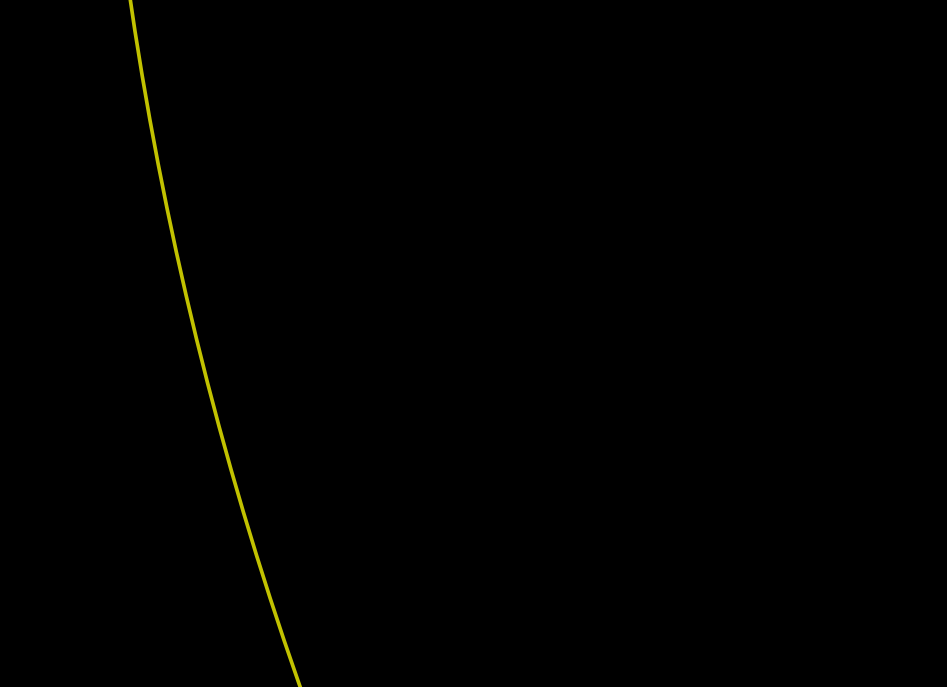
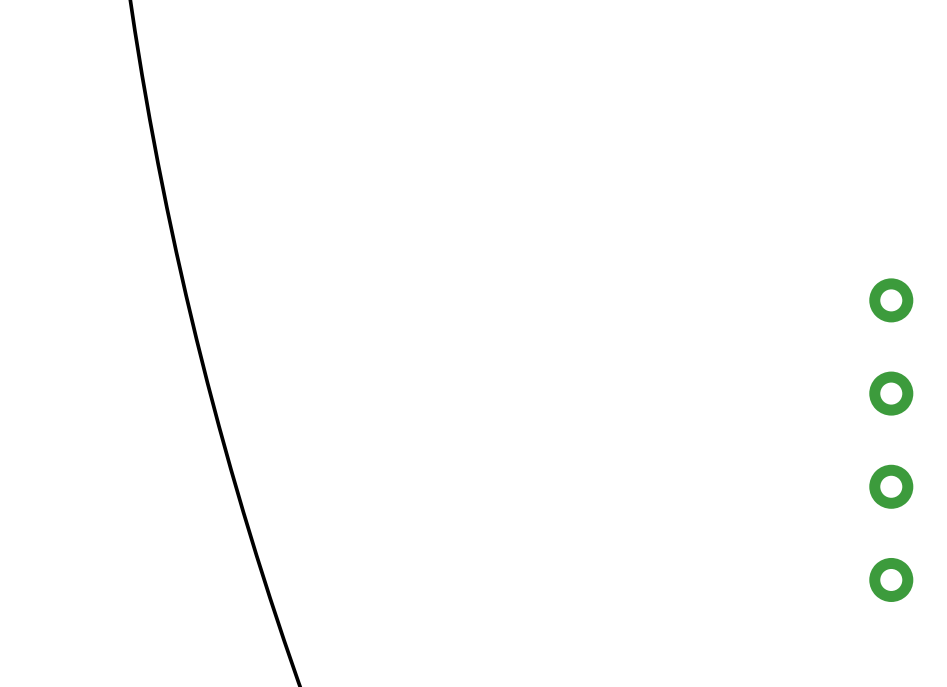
via: none -> (891, 300)
via: none -> (891, 393)
via: none -> (891, 486)
via: none -> (891, 579)

